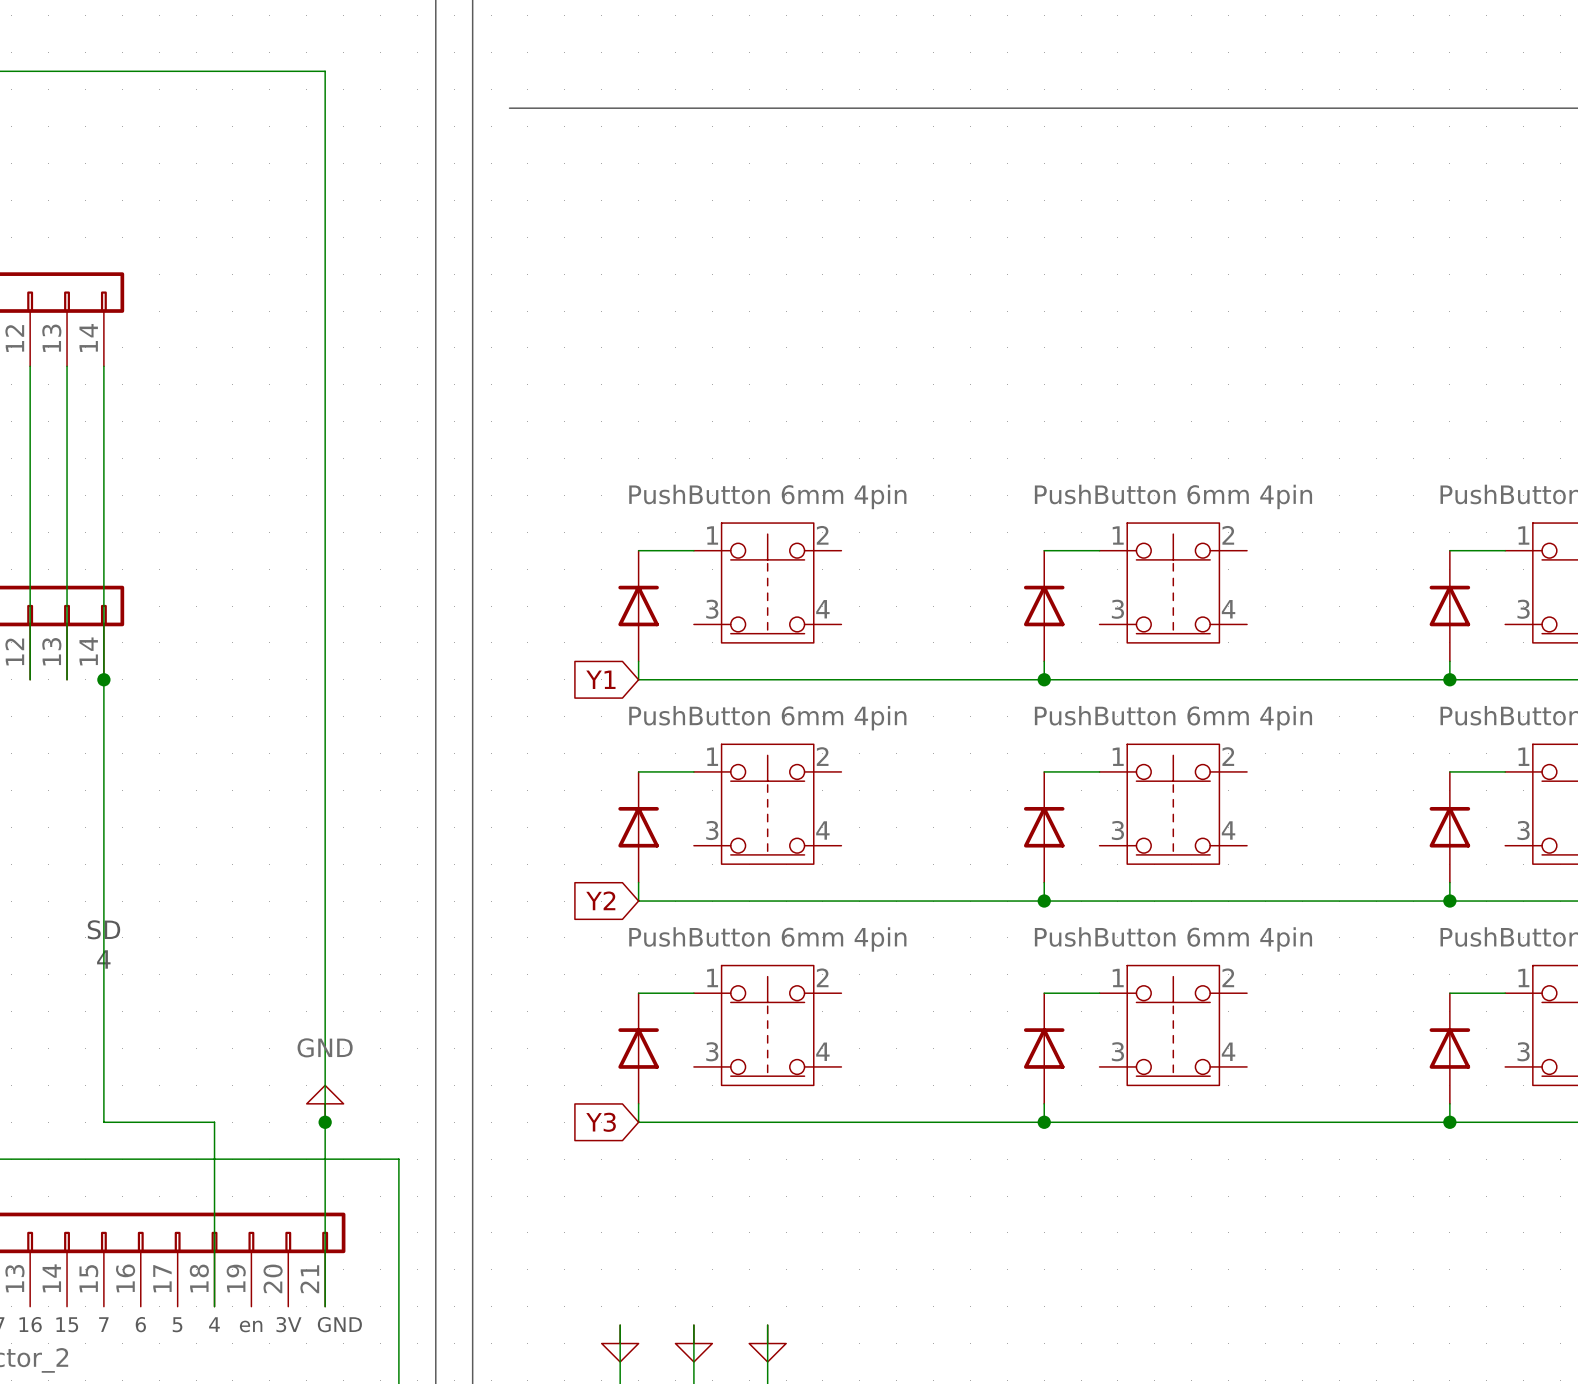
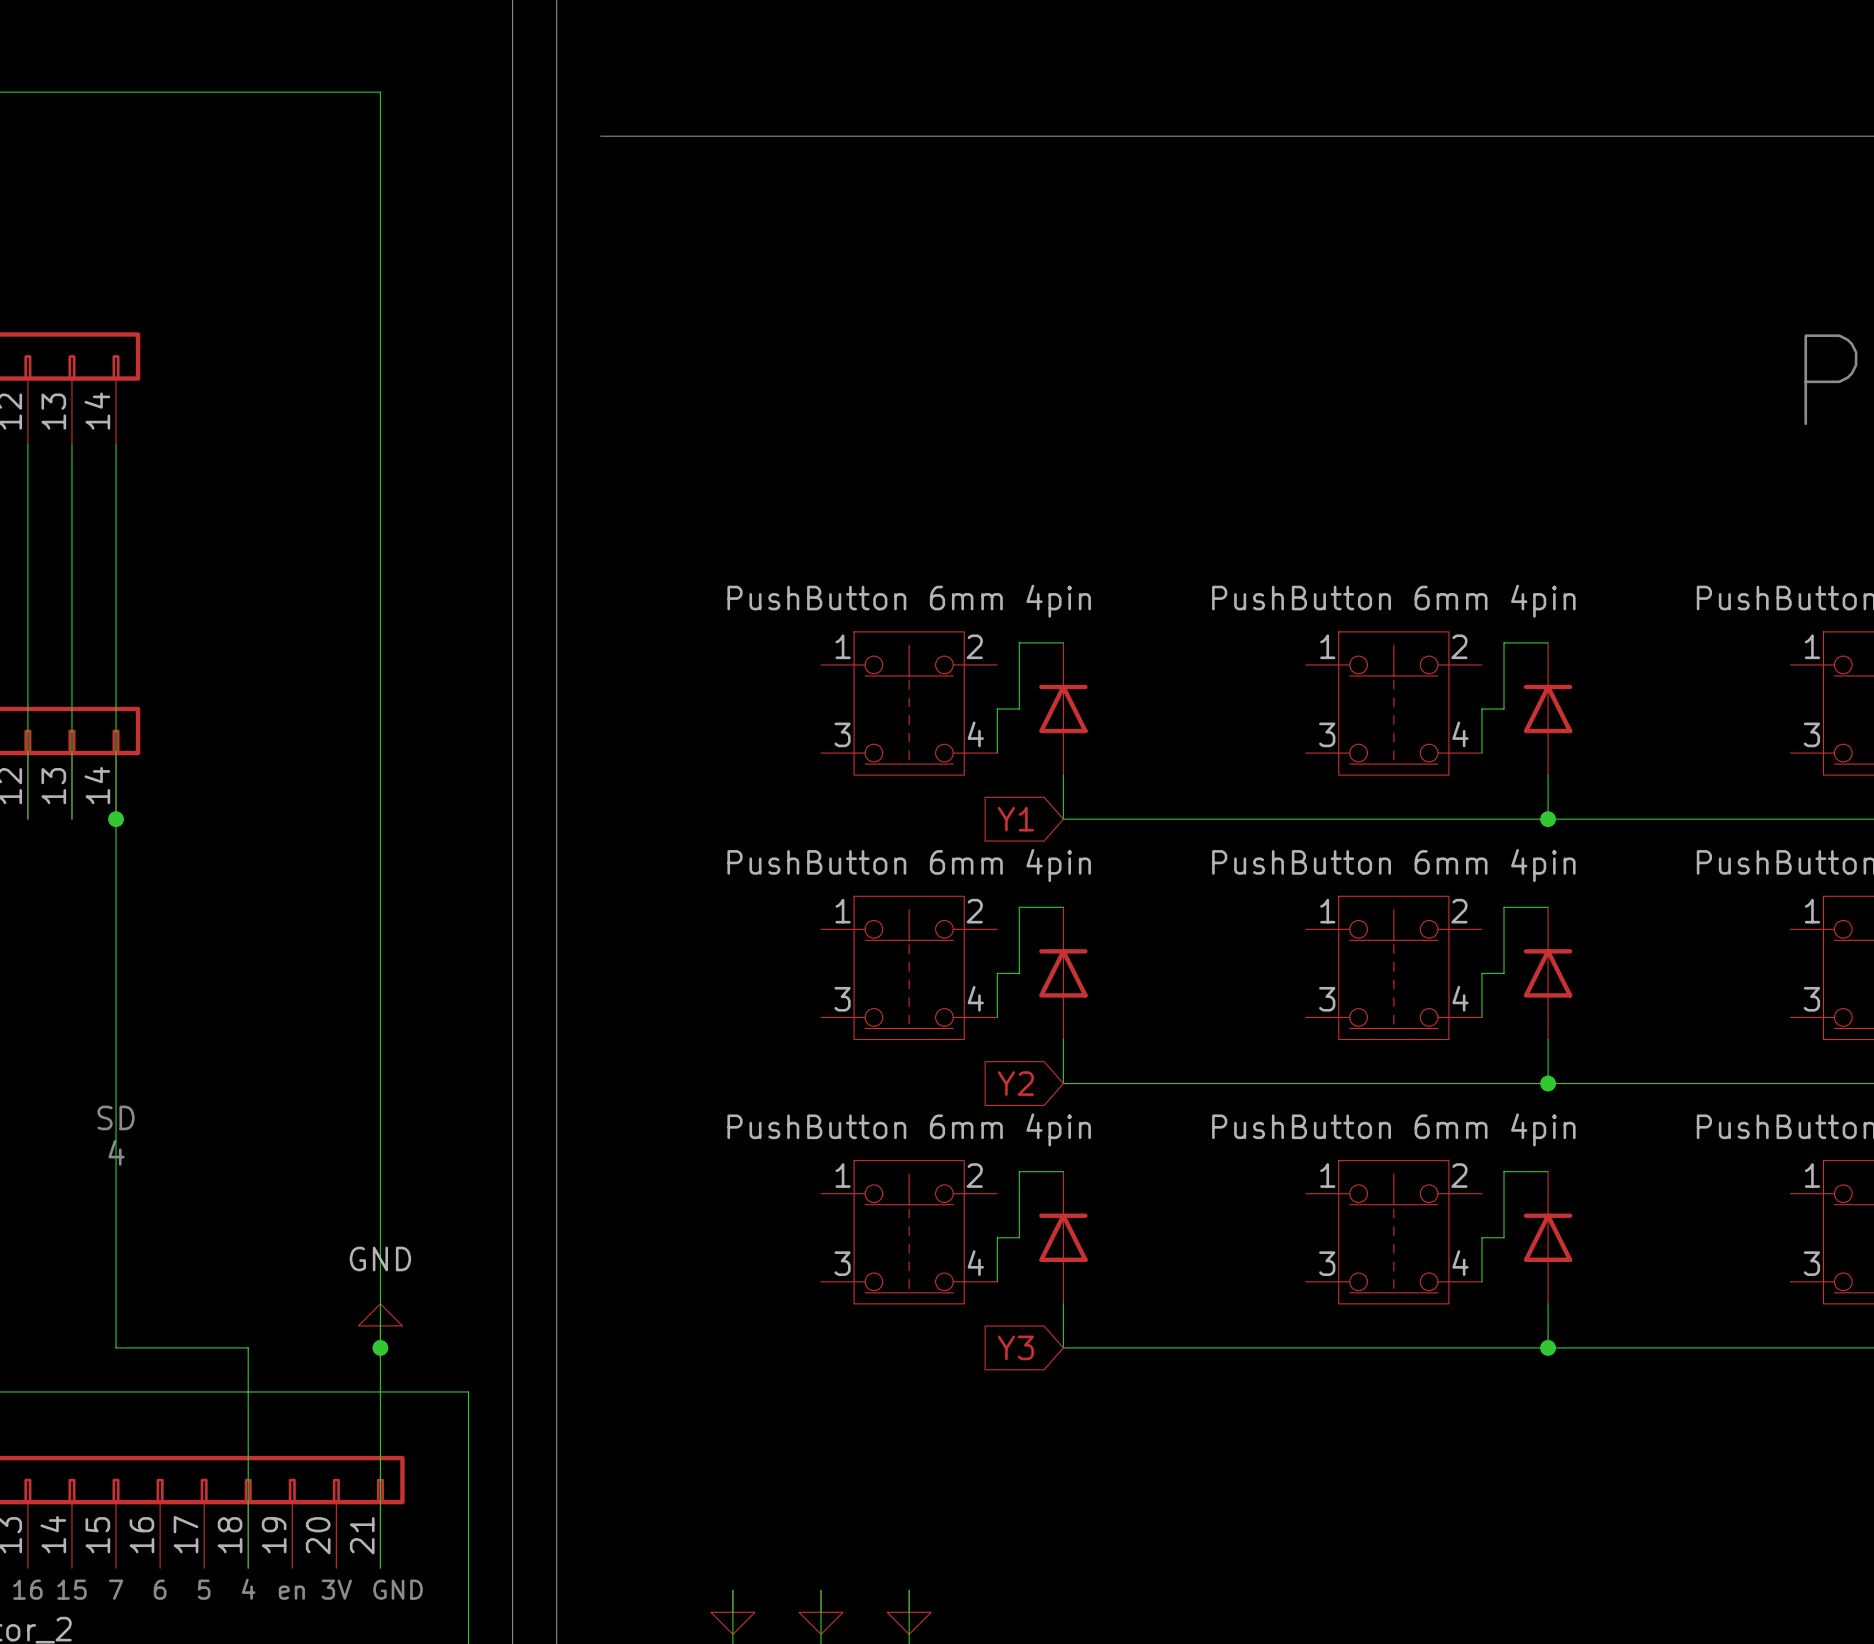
wire: none -> (1063, 642) (1019, 642) (1019, 709) (997, 709) (997, 753)
wire: none -> (1548, 642) (1504, 642) (1504, 709) (1481, 709) (1481, 753)
wire: (638, 550) (693, 550) -> none
wire: (1044, 550) (1099, 550) -> none
wire: (1449, 550) (1505, 550) -> none
part: none -> (1063, 709)
part: none -> (1548, 709)
part: (638, 606) -> none
part: (1044, 606) -> none
part: (1449, 606) -> none
wire: none -> (1548, 775) (1548, 819)
wire: (638, 661) (638, 679) (896, 679) -> (1063, 775) (1063, 819)
wire: (1044, 661) (1044, 679) -> none
wire: (1449, 661) (1449, 679) -> none
global label position: Y1 (600, 679) -> Y1 (1015, 819)
junction: (1044, 679) -> none
junction: none -> (1548, 819)
junction: (1449, 679) -> none
wire: none -> (1063, 907) (1019, 907) (1019, 973) (997, 973) (997, 1017)
wire: none -> (1548, 907) (1504, 907) (1504, 973) (1481, 973) (1481, 1017)
wire: (638, 771) (693, 771) -> none
wire: (1044, 771) (1099, 771) -> none
wire: (1449, 771) (1505, 771) -> none
part: none -> (1063, 973)
part: none -> (1548, 973)
part: (638, 827) -> none
part: (1044, 827) -> none
part: (1449, 827) -> none
wire: none -> (1548, 1039) (1548, 1083)
wire: (638, 882) (638, 901) (896, 901) -> (1063, 1039) (1063, 1083)
wire: (1044, 882) (1044, 901) -> none
wire: (1449, 882) (1449, 901) -> none
global label position: Y2 (600, 900) -> Y2 (1015, 1083)
junction: (1044, 901) -> none
junction: none -> (1548, 1083)
junction: (1449, 901) -> none
wire: none -> (1063, 1171) (1019, 1171) (1019, 1237) (997, 1237) (997, 1281)
wire: none -> (1548, 1171) (1504, 1171) (1504, 1237) (1481, 1237) (1481, 1281)
wire: (638, 993) (693, 993) -> none
wire: (1044, 993) (1099, 993) -> none
wire: (1449, 993) (1505, 993) -> none
part: none -> (1063, 1237)
part: none -> (1548, 1237)
part: (638, 1048) -> none
part: (1044, 1048) -> none
part: (1449, 1048) -> none
wire: none -> (1548, 1303) (1548, 1347)
wire: (638, 1103) (638, 1122) (896, 1122) -> (1063, 1303) (1063, 1347)
wire: (1044, 1103) (1044, 1122) -> none
wire: (1449, 1103) (1449, 1122) -> none
global label position: Y3 (601, 1122) -> Y3 (1015, 1347)
junction: (1044, 1122) -> none
junction: none -> (1548, 1347)
junction: (1449, 1122) -> none

